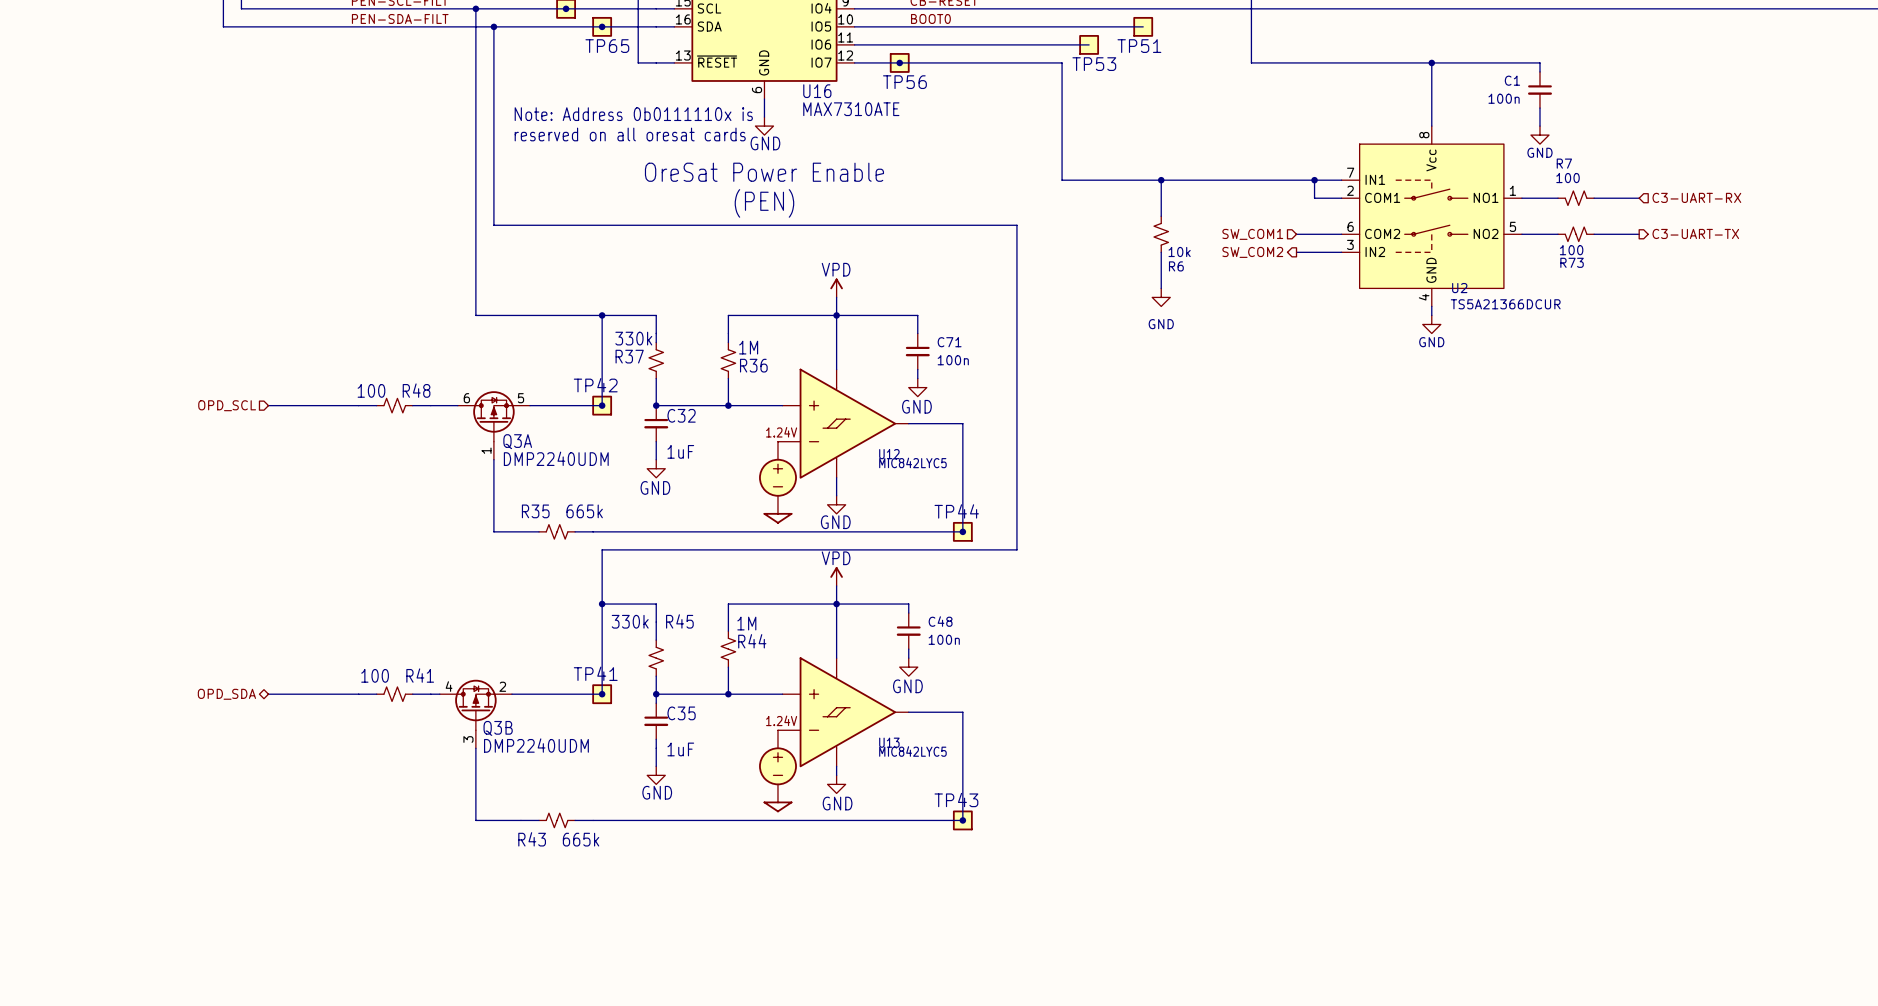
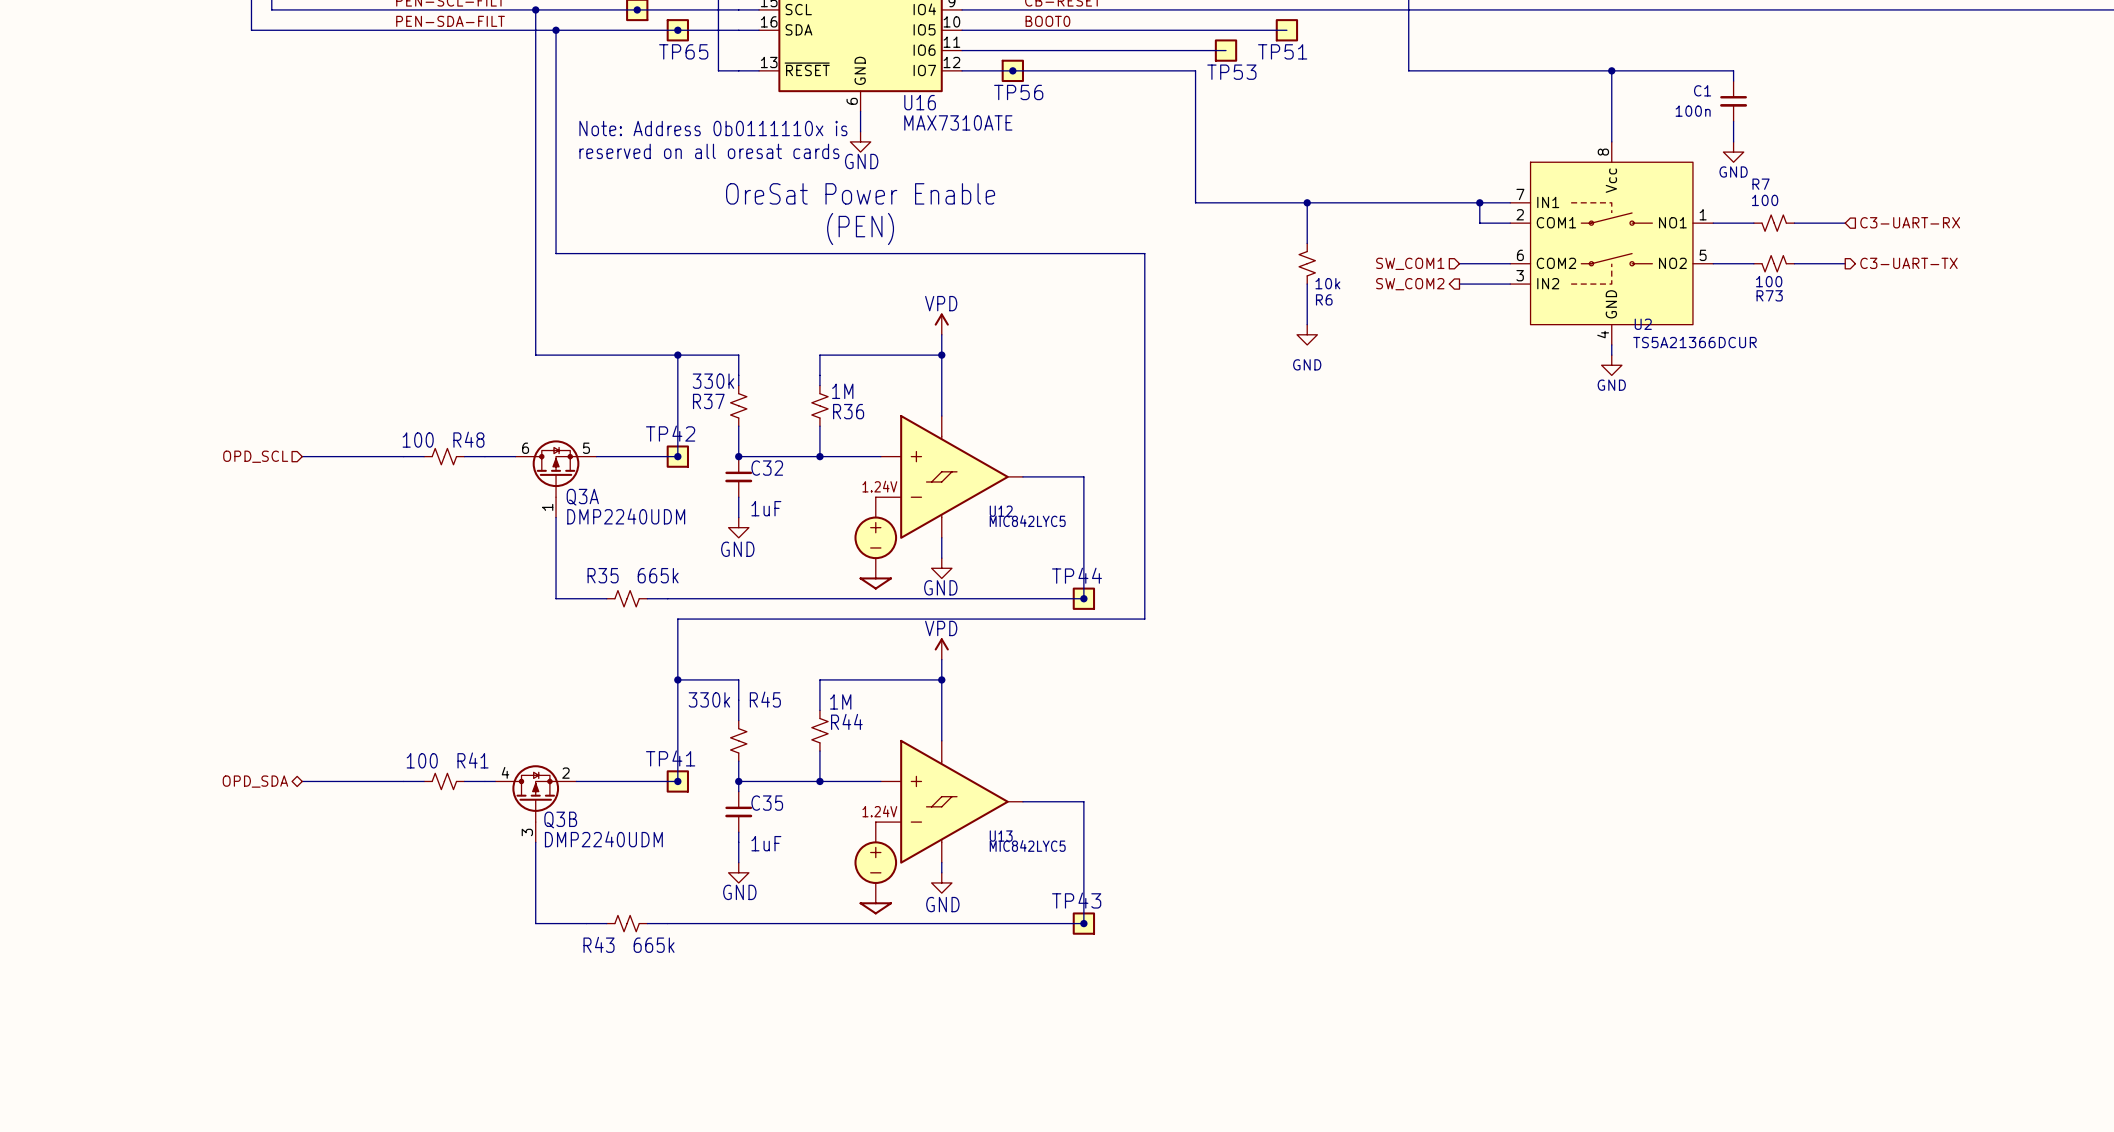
wire: (836, 315) (917, 315) (917, 333) -> none
C71: 100n (917, 351) -> none
wire: (917, 369) (917, 378) -> none
power symbol: GND (917, 387) -> none
wire: (836, 604) (908, 604) (908, 613) -> none
C48: 100n (908, 631) -> none
wire: (908, 649) (908, 658) -> none
power symbol: GND (908, 667) -> none

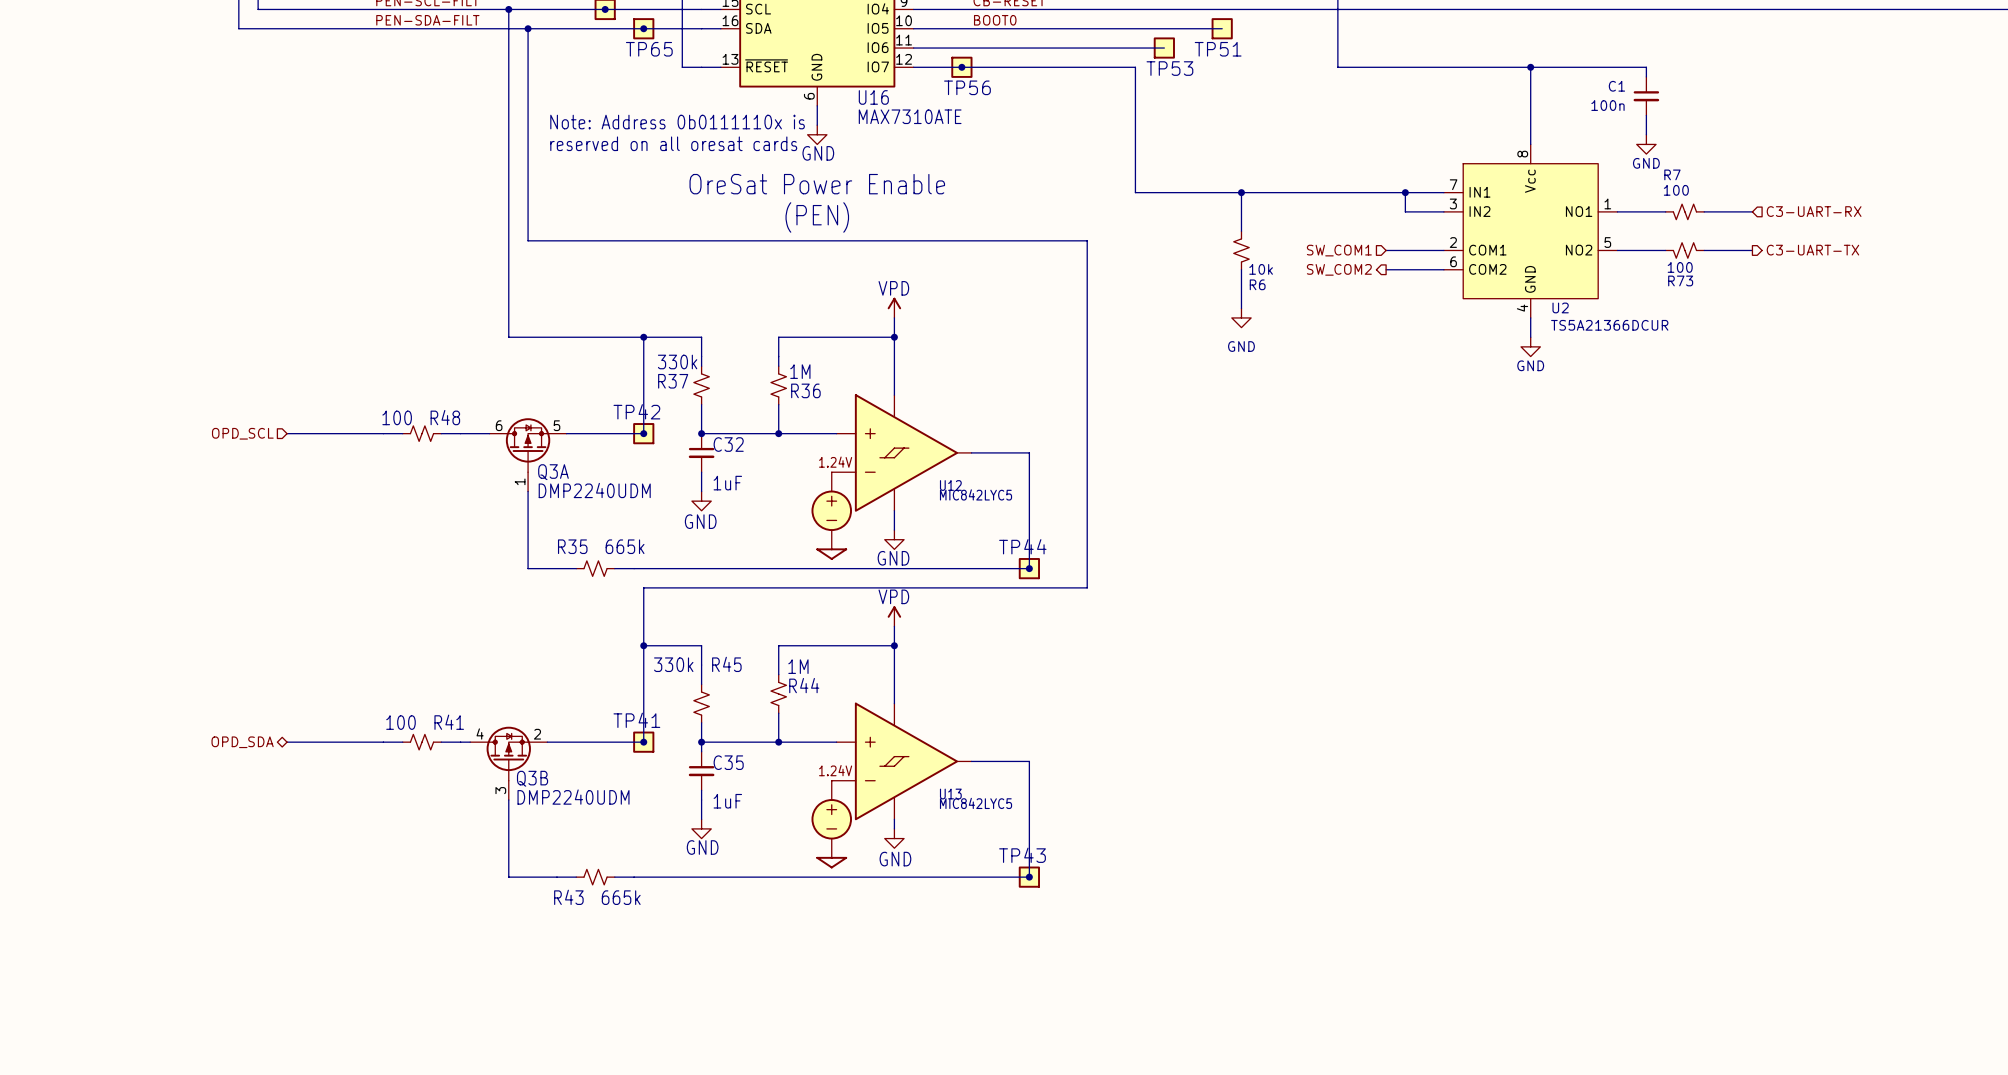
U2 symbol: [1510, 141, 1714, 345] -> [1443, 144, 1618, 318]

